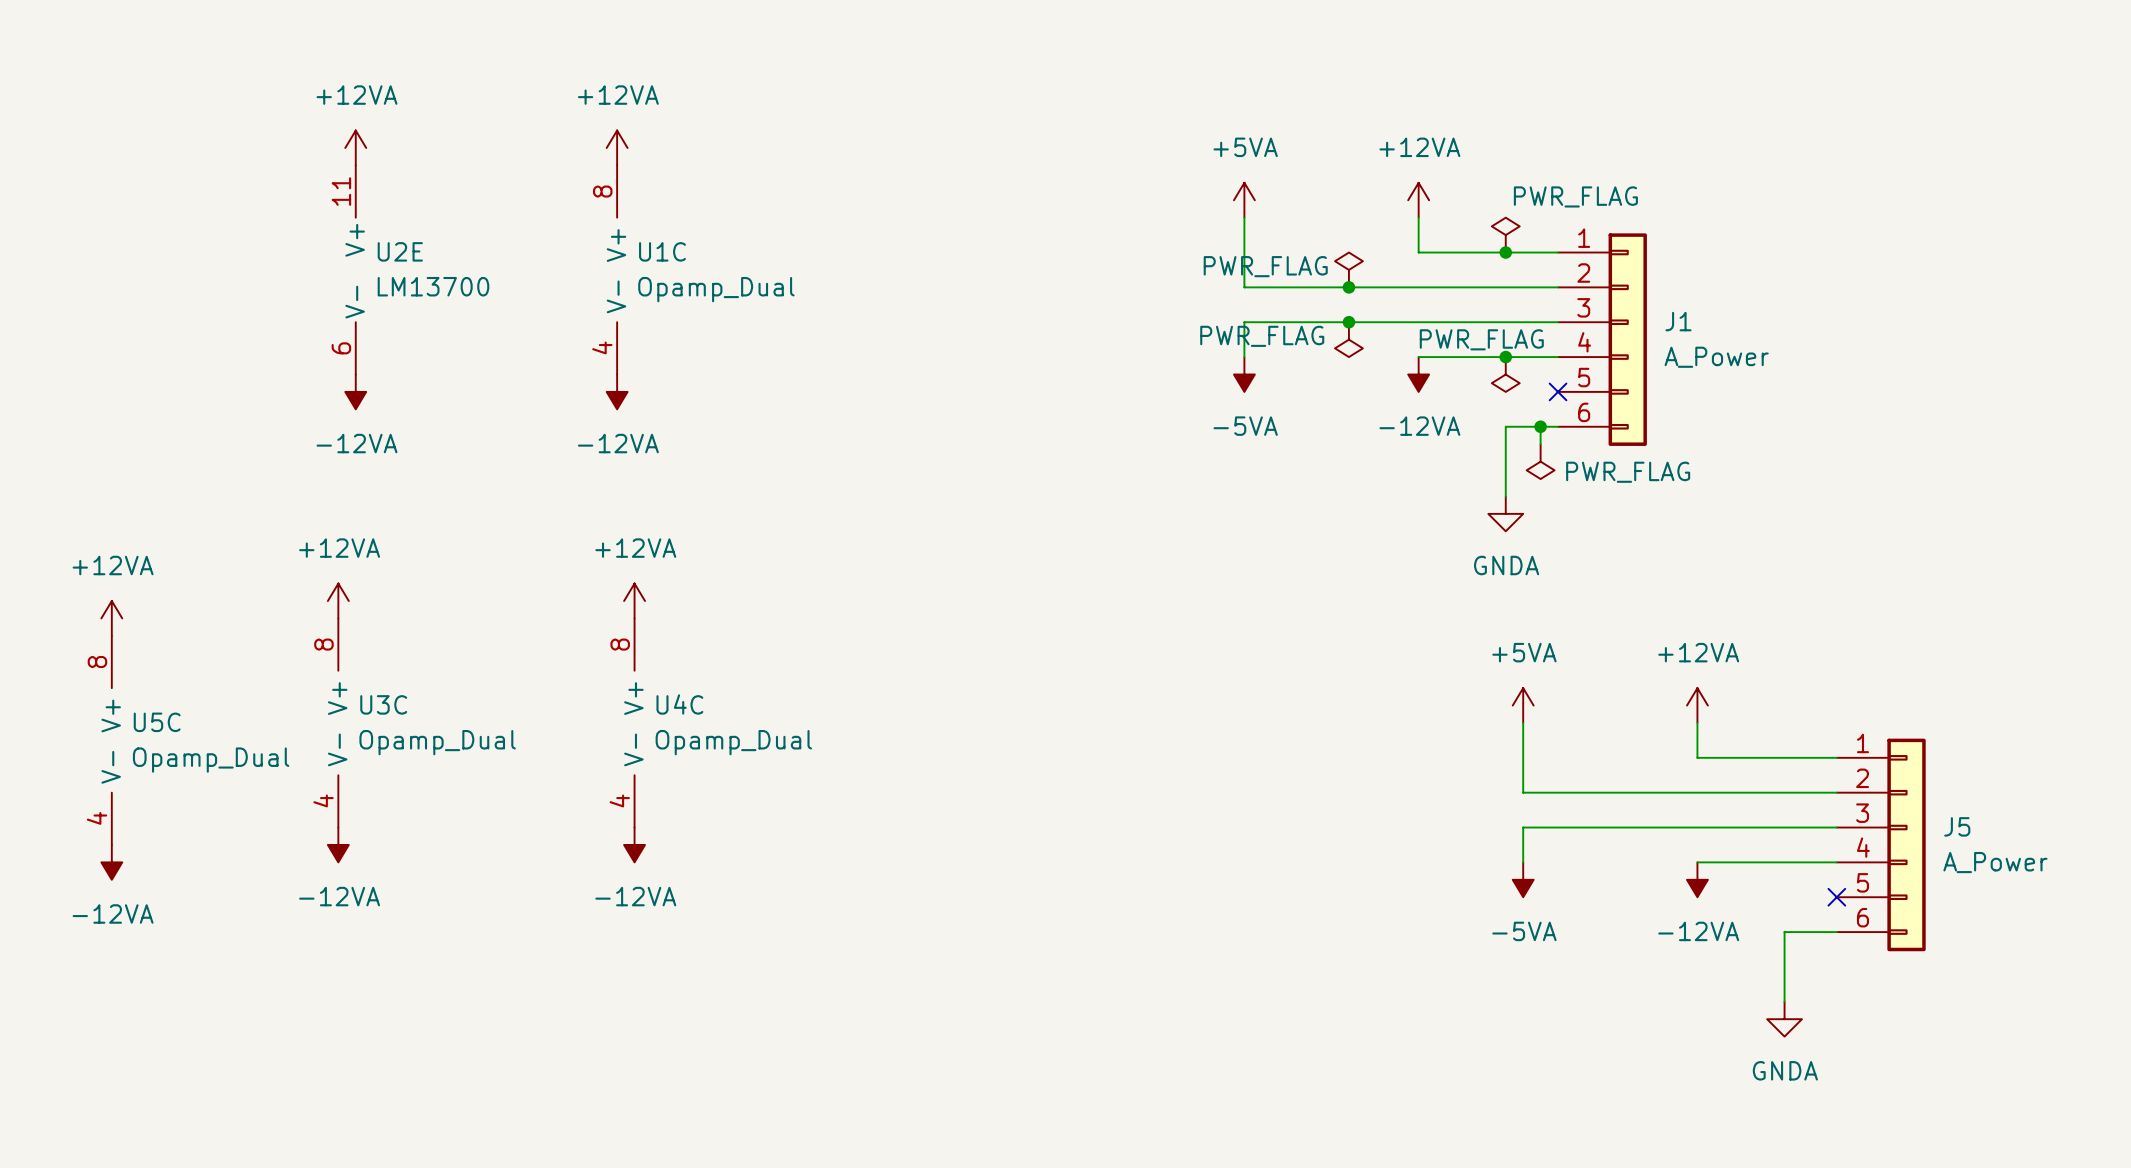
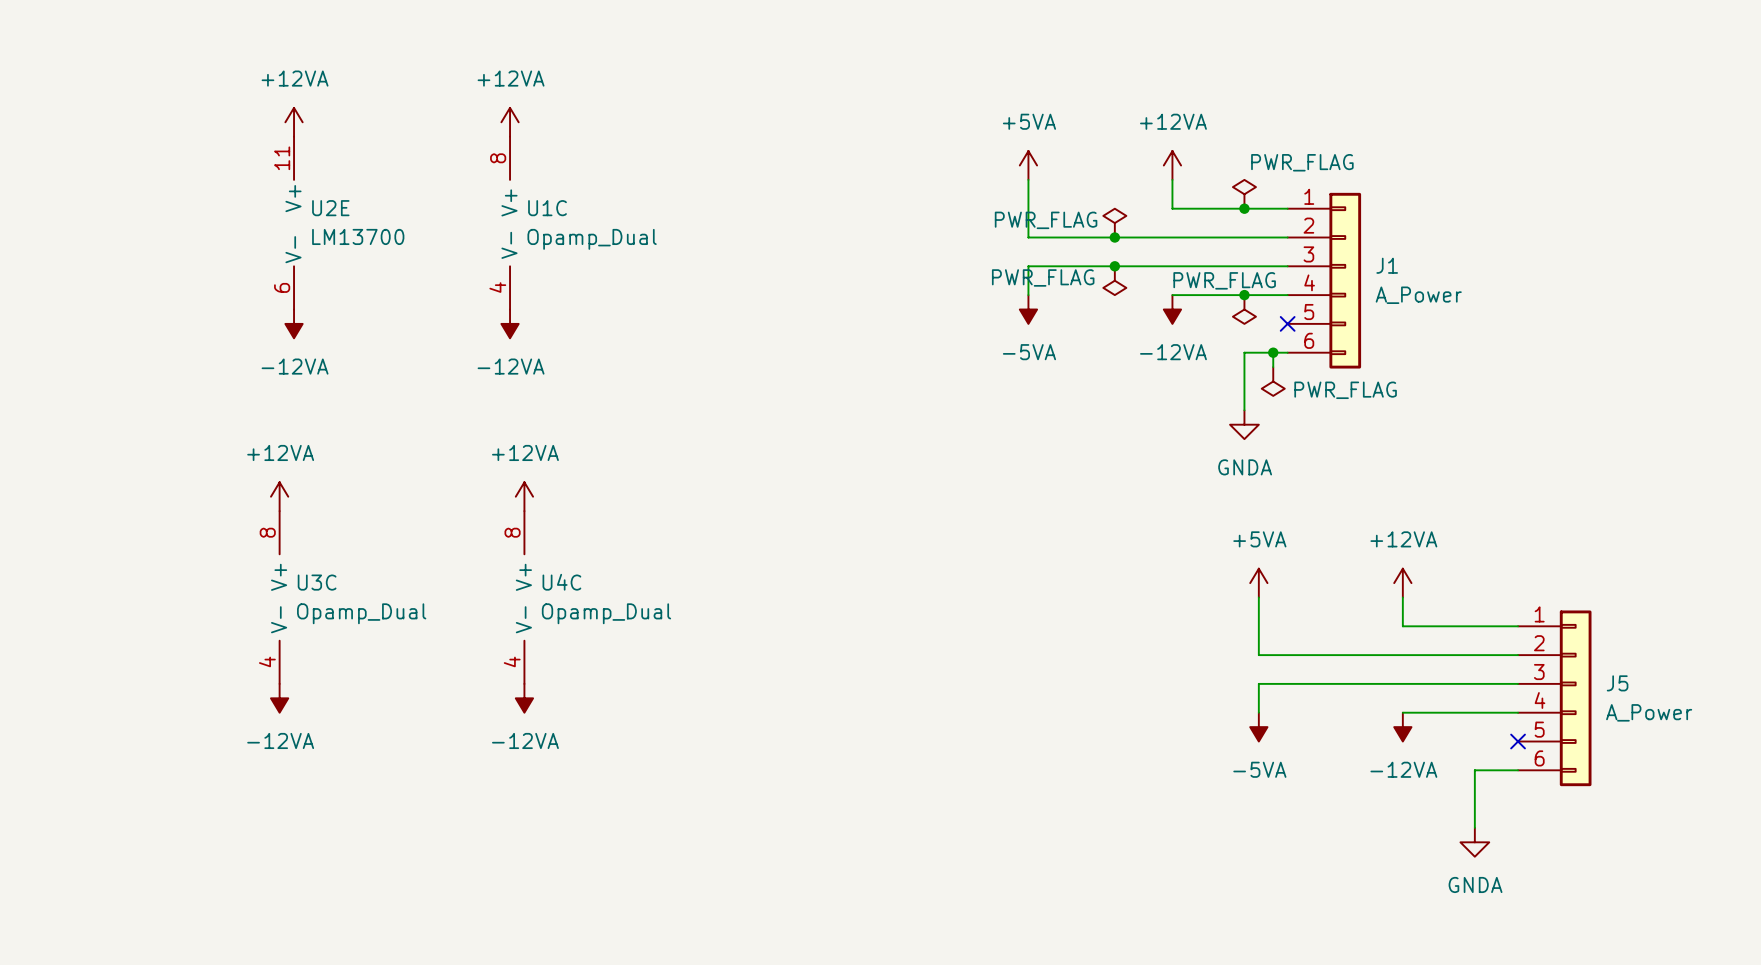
power symbol: +12VA (111, 618) -> none
U5C: Opamp_Dual (111, 740) -> none
power symbol: -12VA (111, 862) -> none

